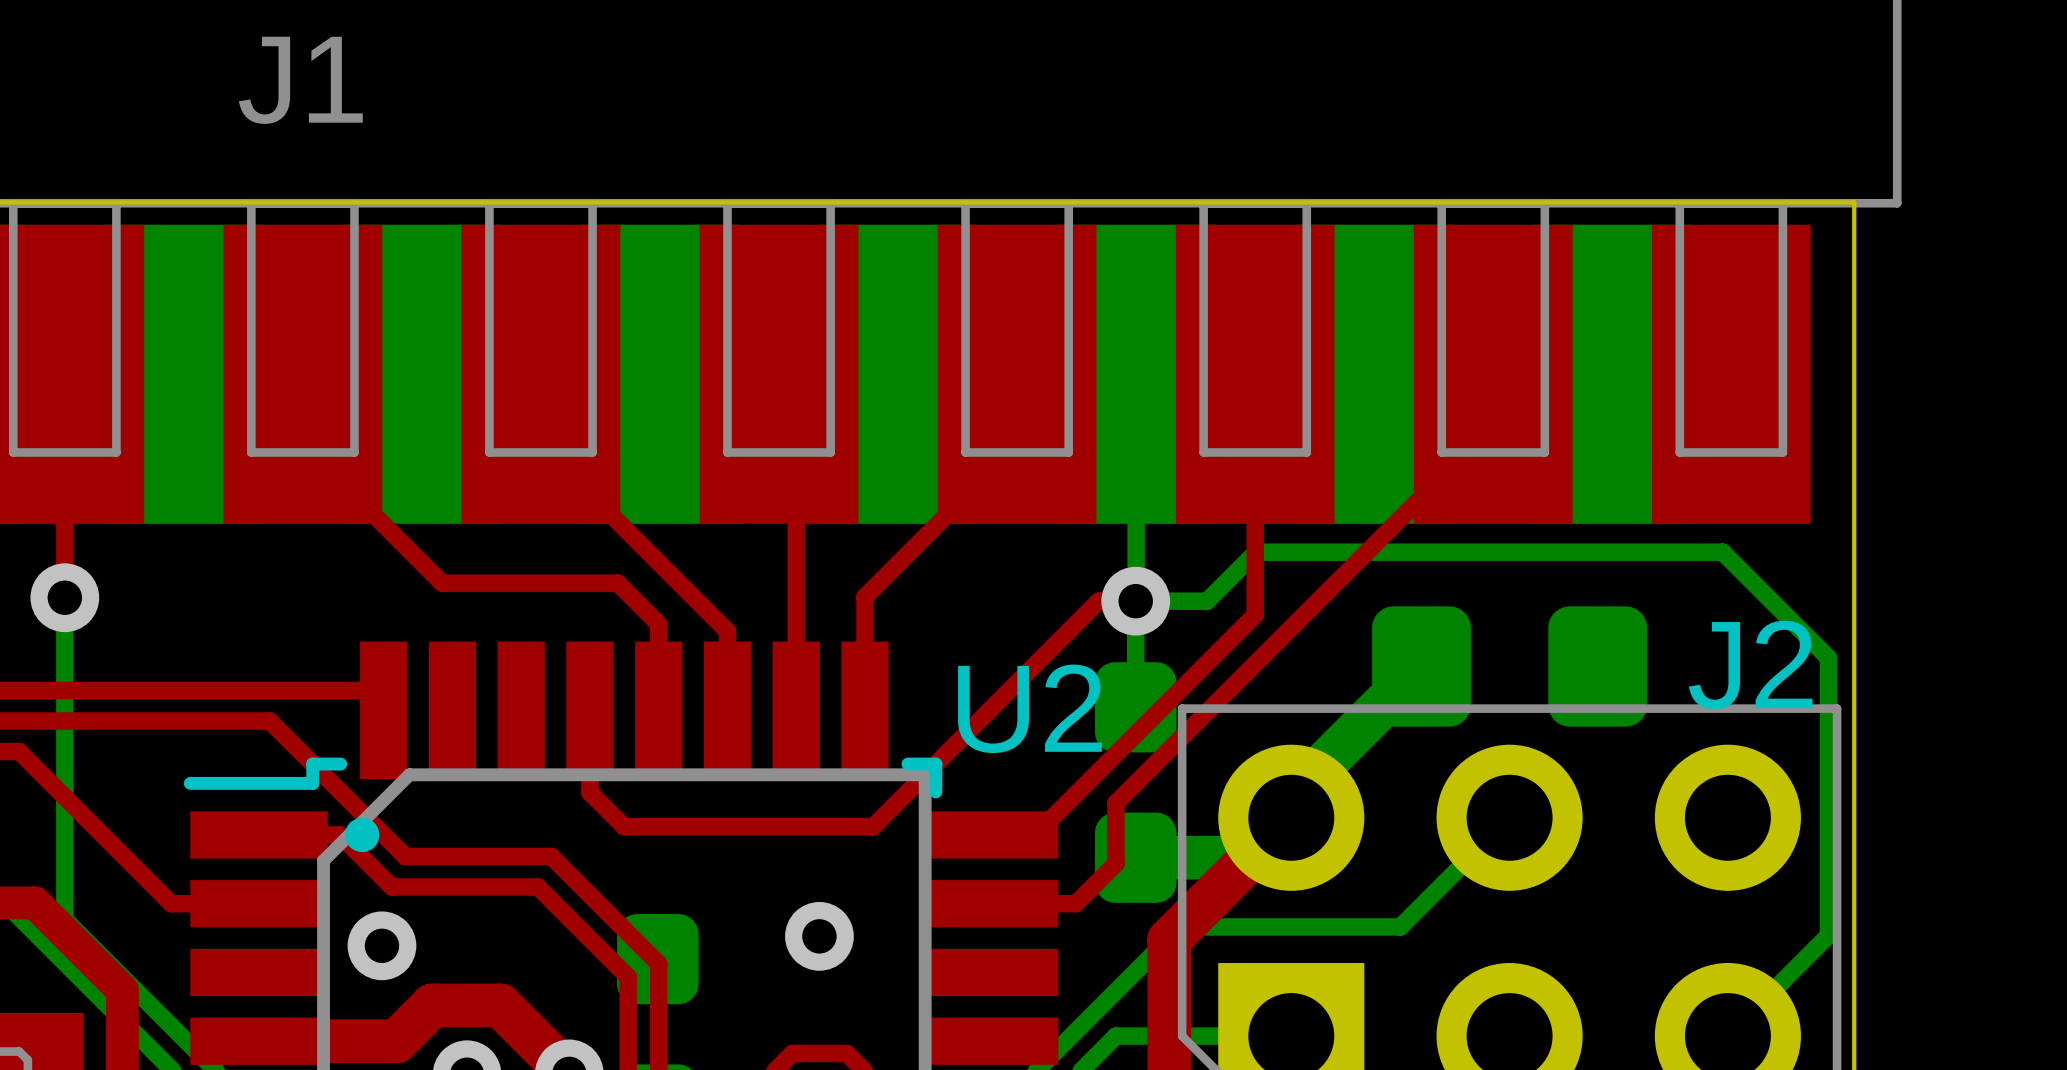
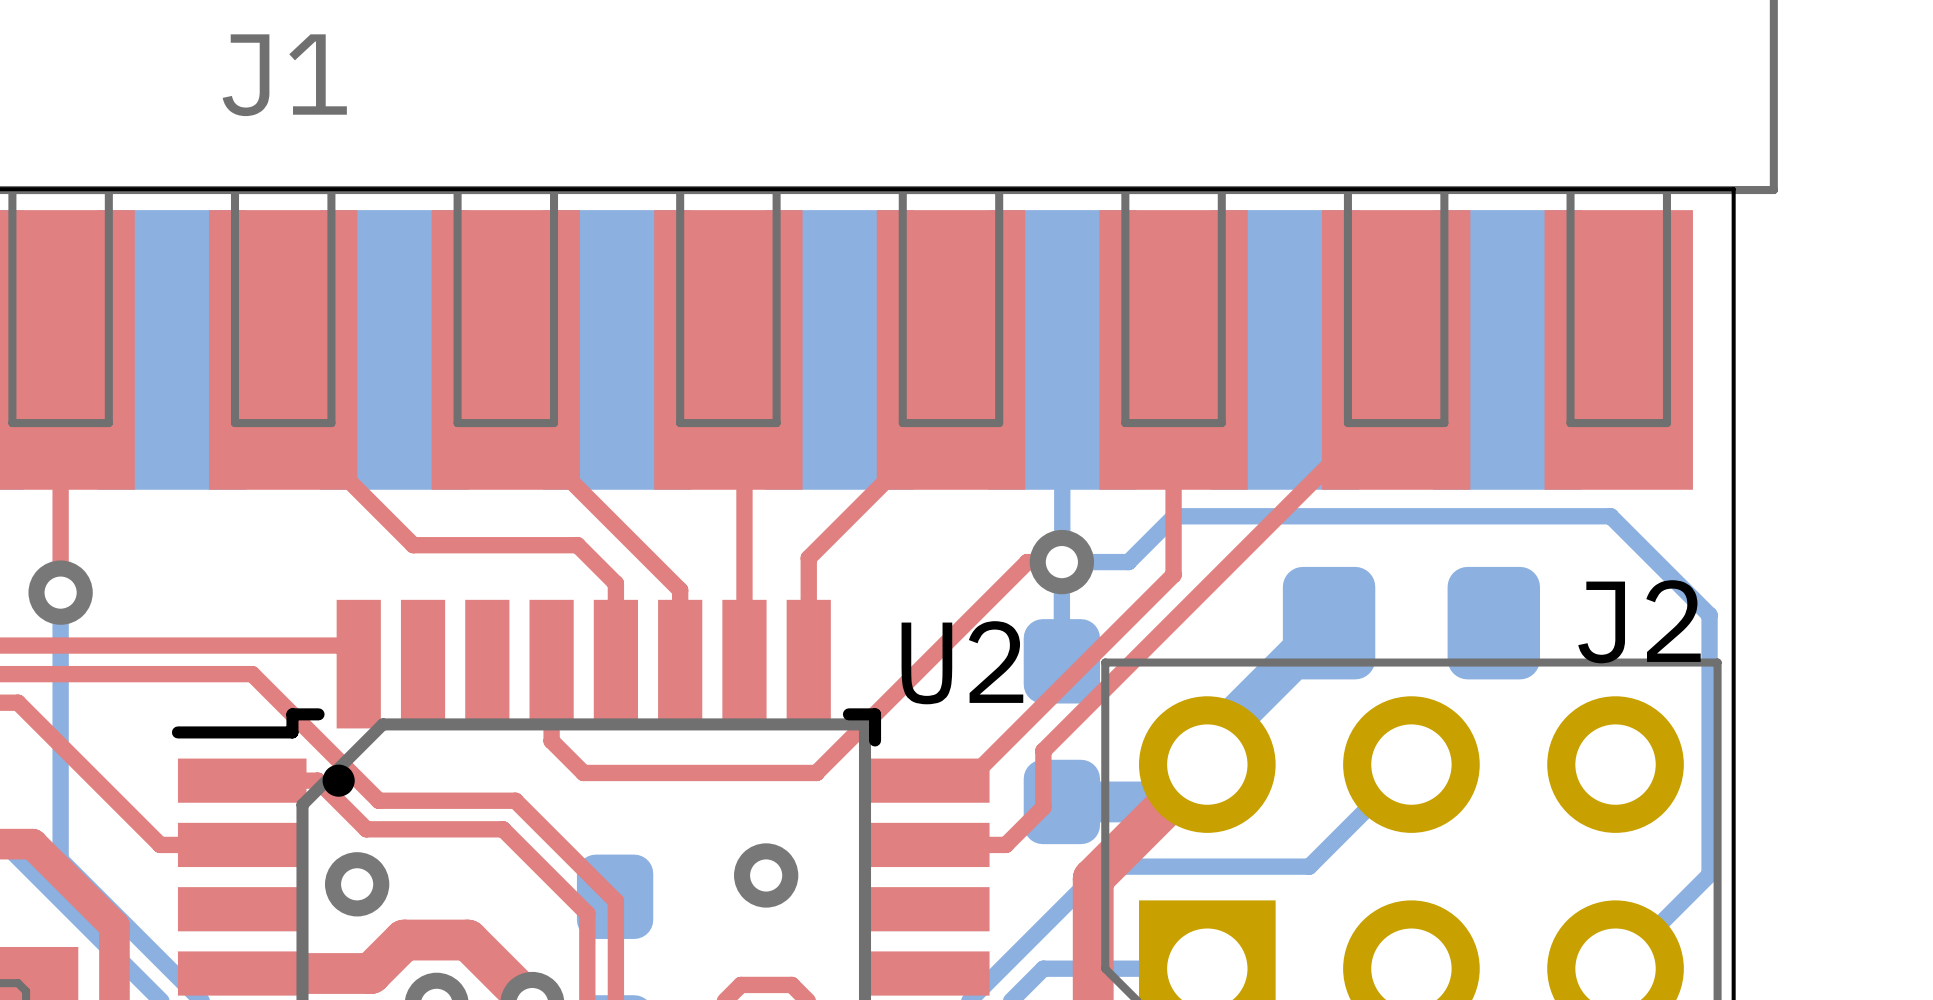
via position: (64, 597) -> (60, 592)

